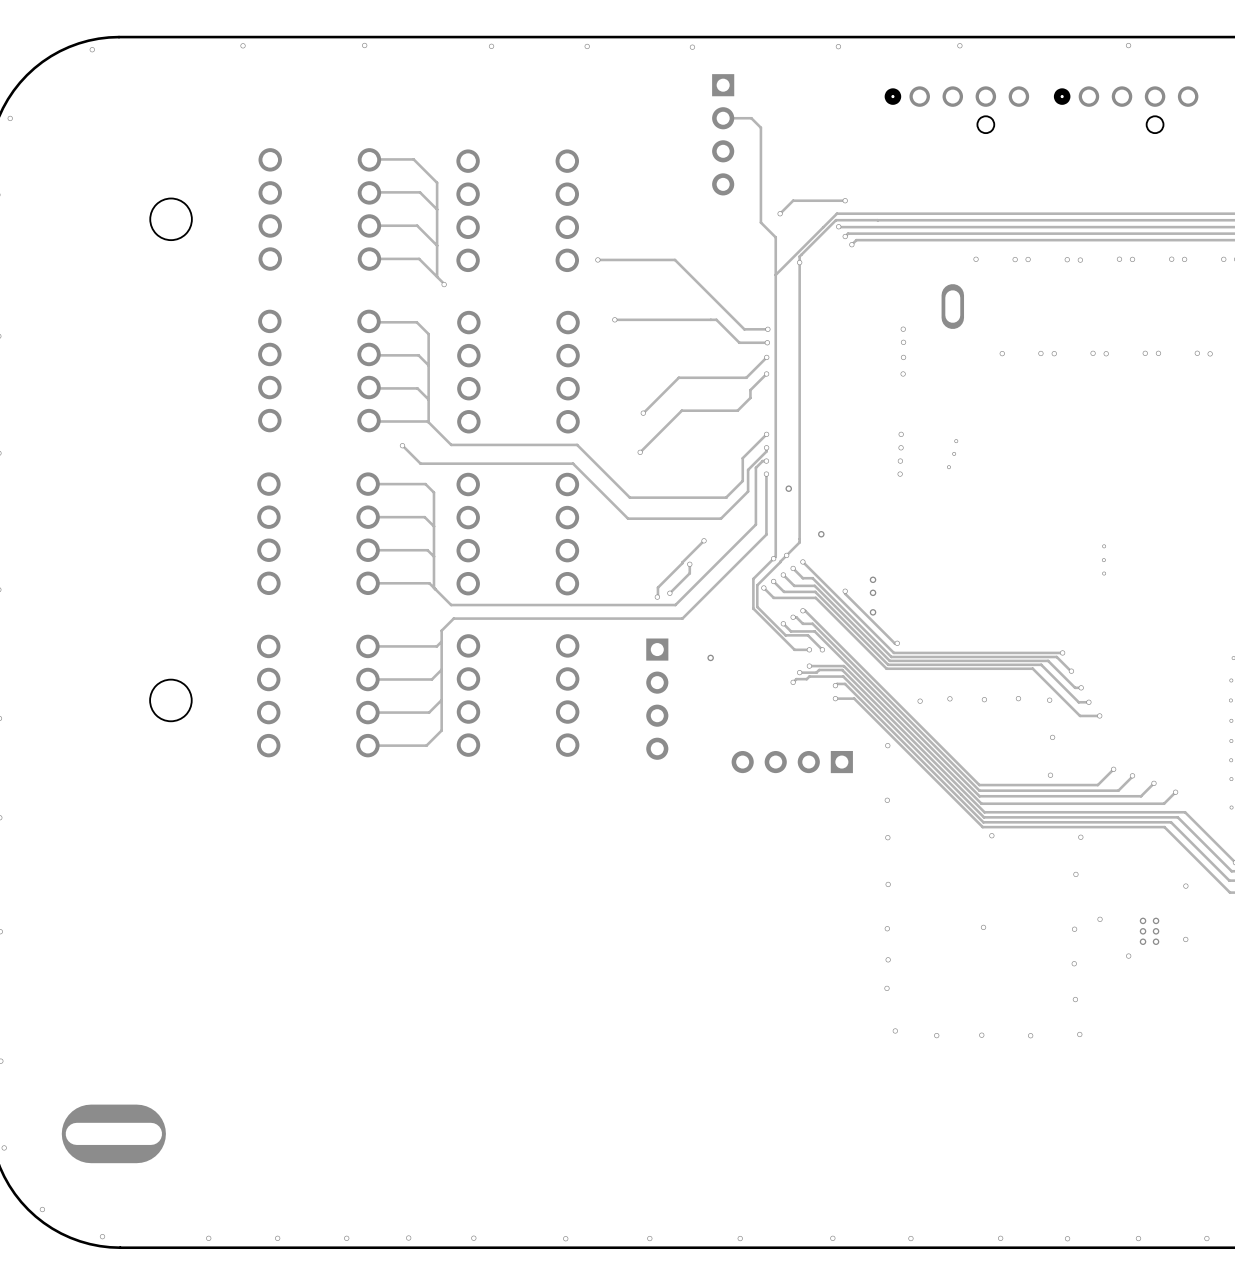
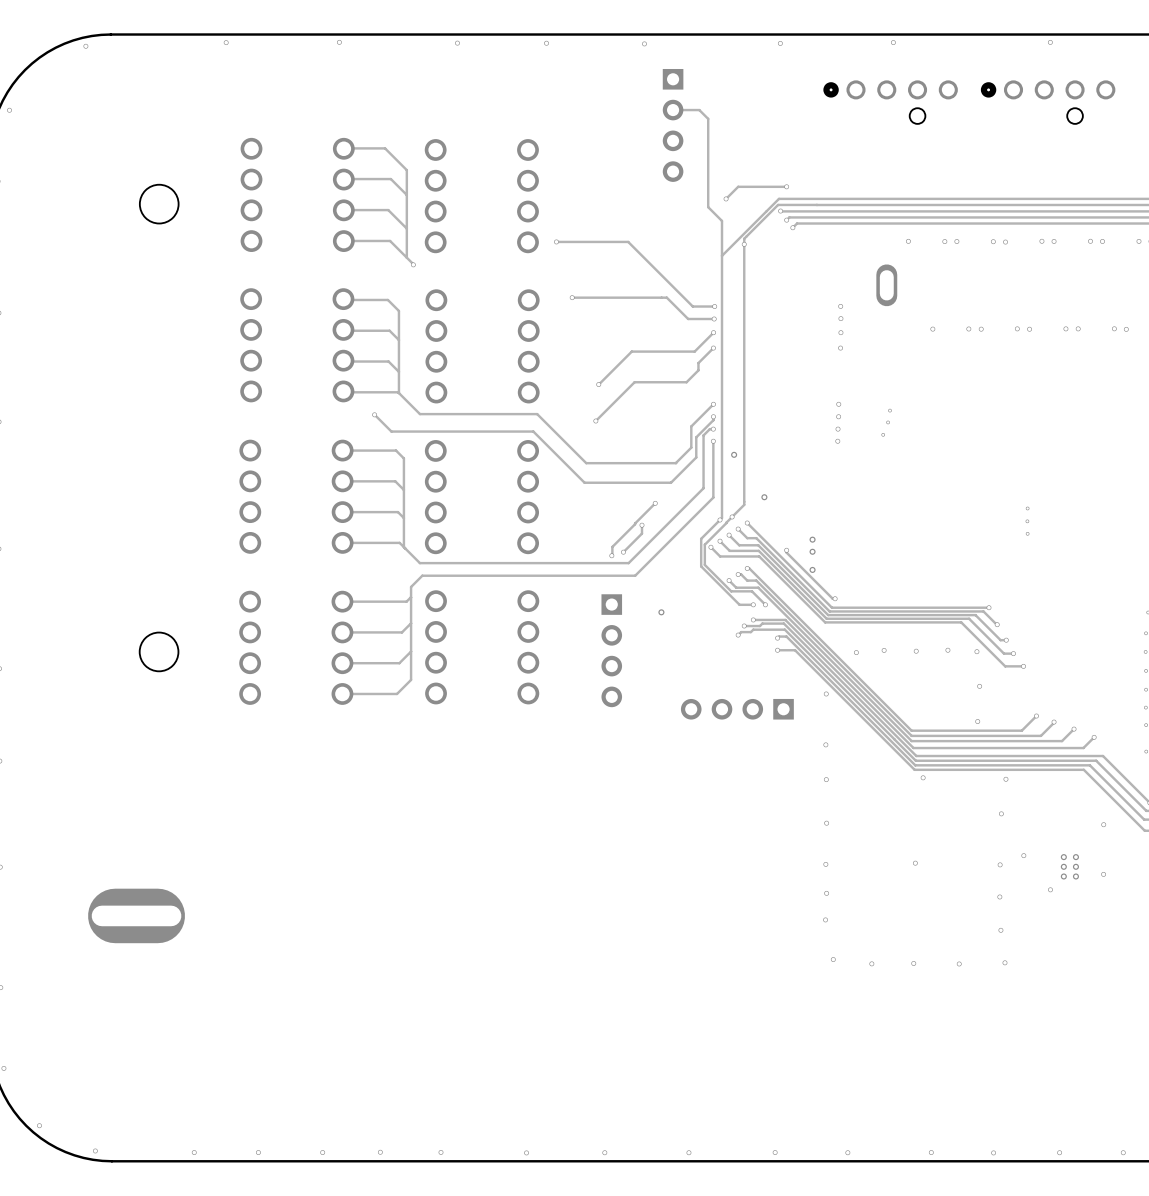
part position: (113, 1133) -> (136, 915)

